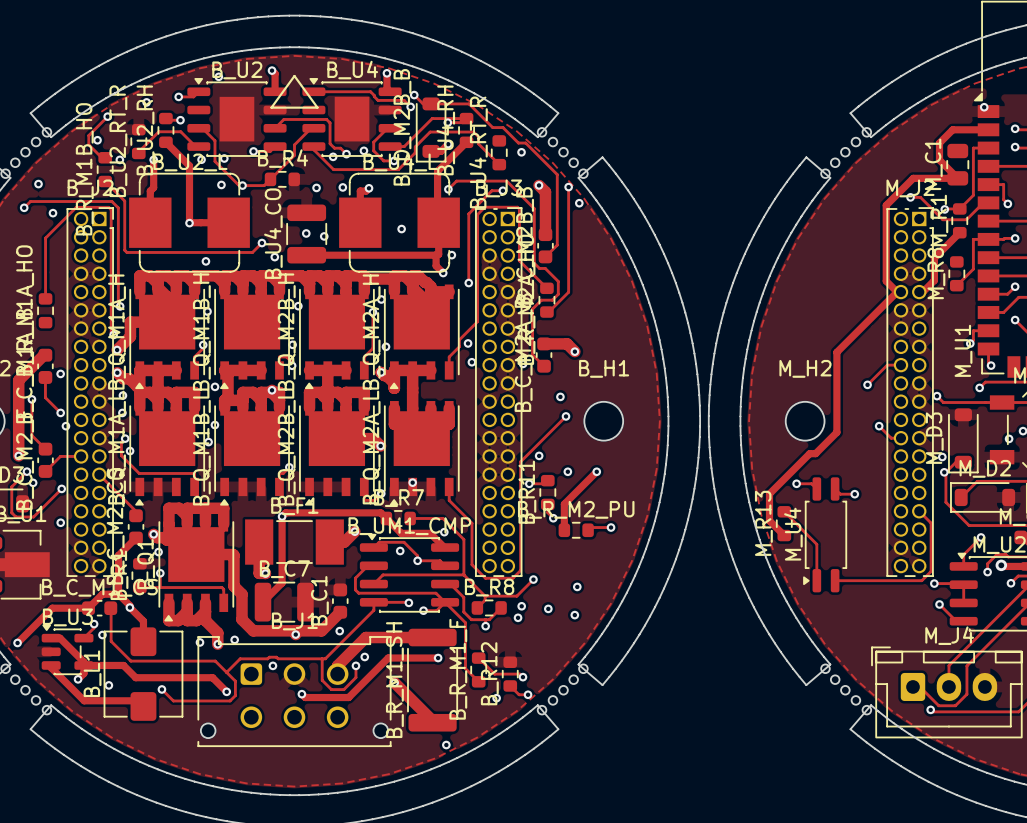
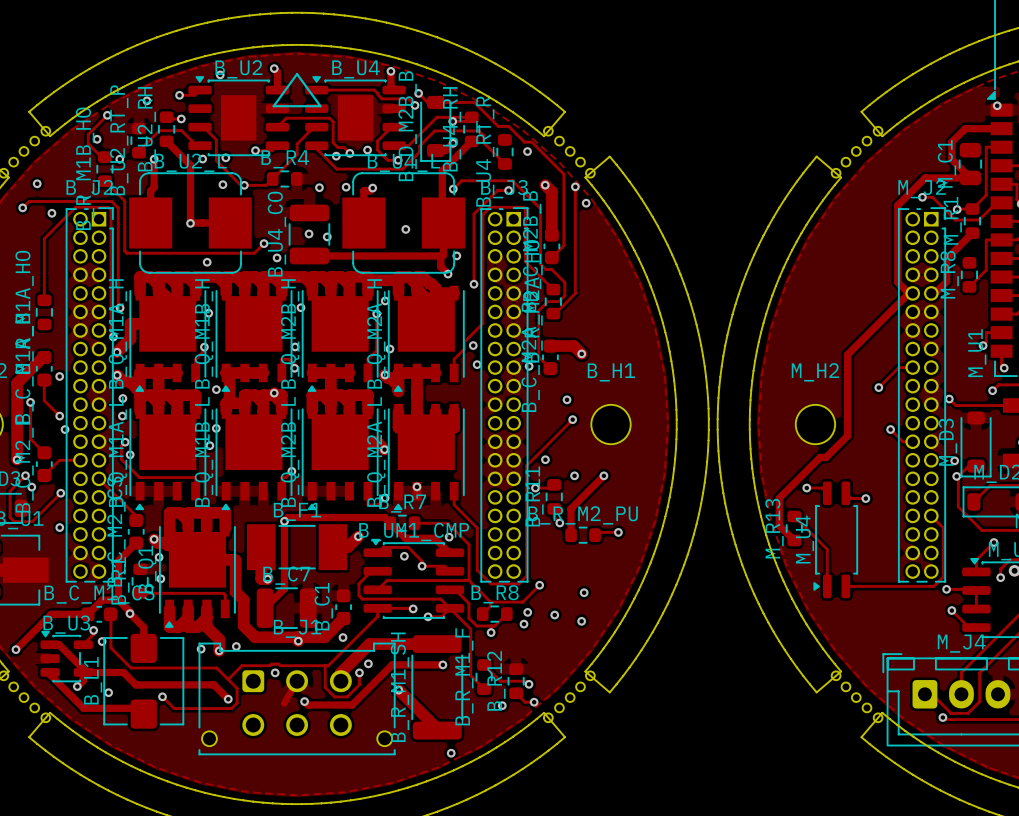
track: none -> (297, 681) (284, 703)

